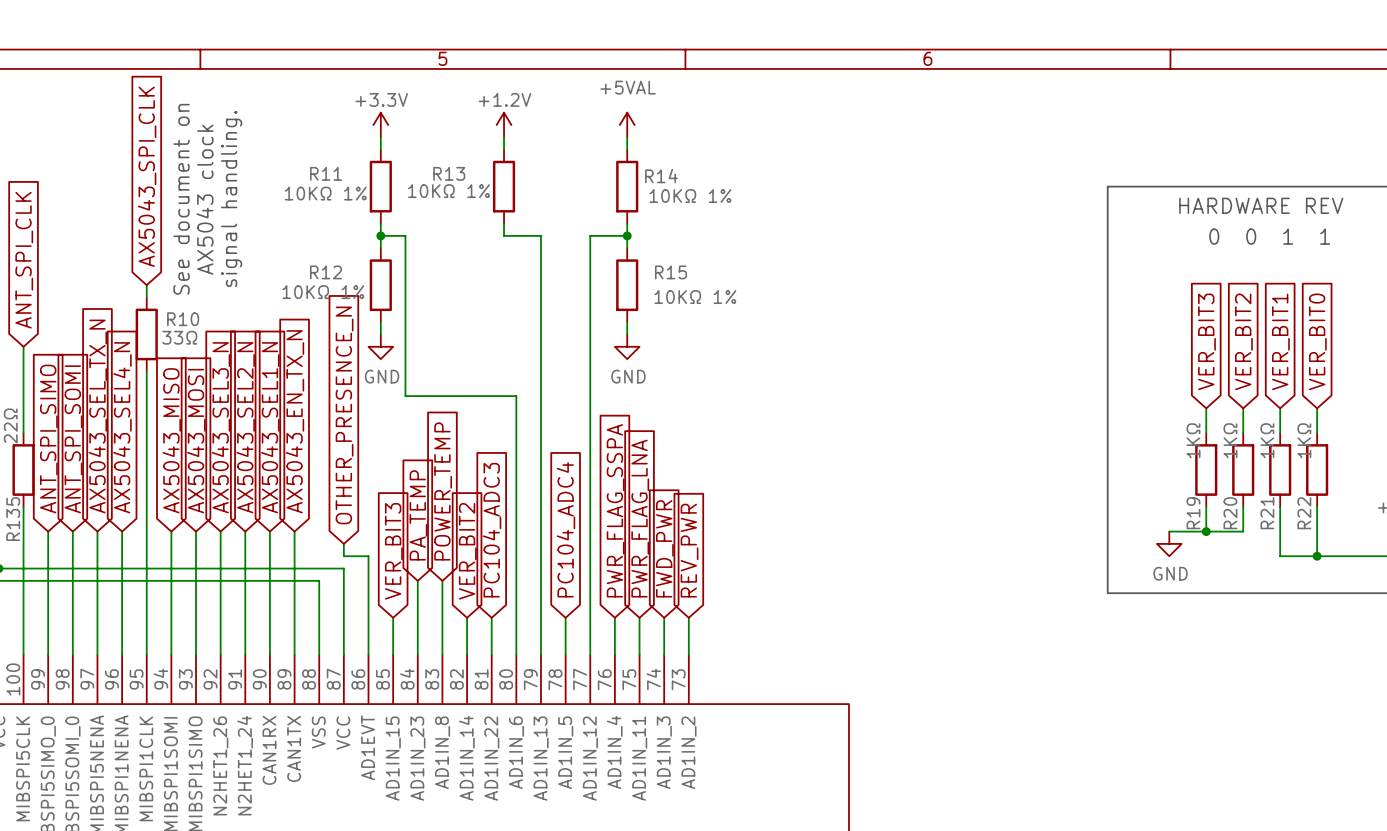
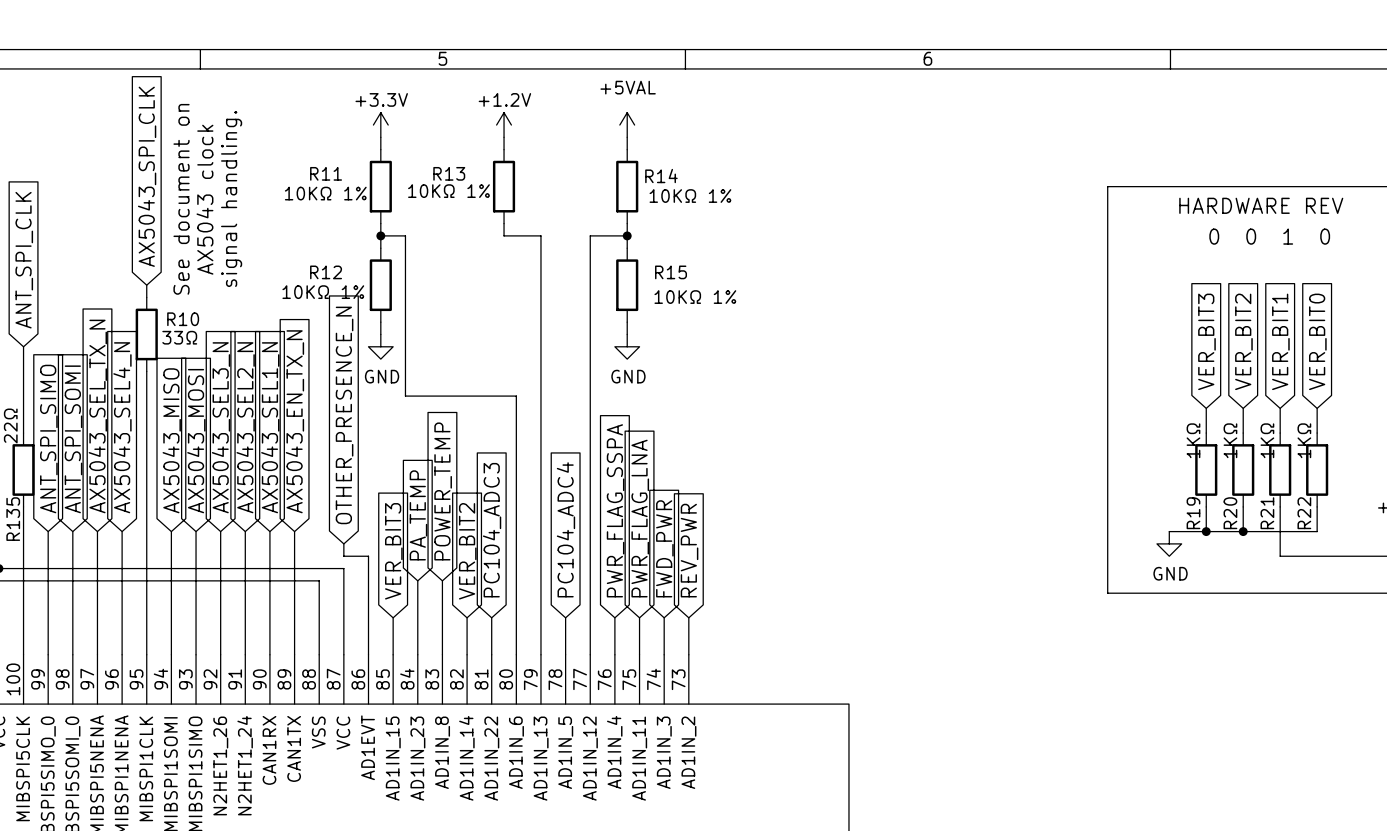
text: 1 (1325, 236) -> 0 (1325, 236)
junction: none -> (1243, 531)
wire: (1317, 531) (1317, 556) -> (1317, 531) (1243, 531)
junction: (1317, 556) -> none

